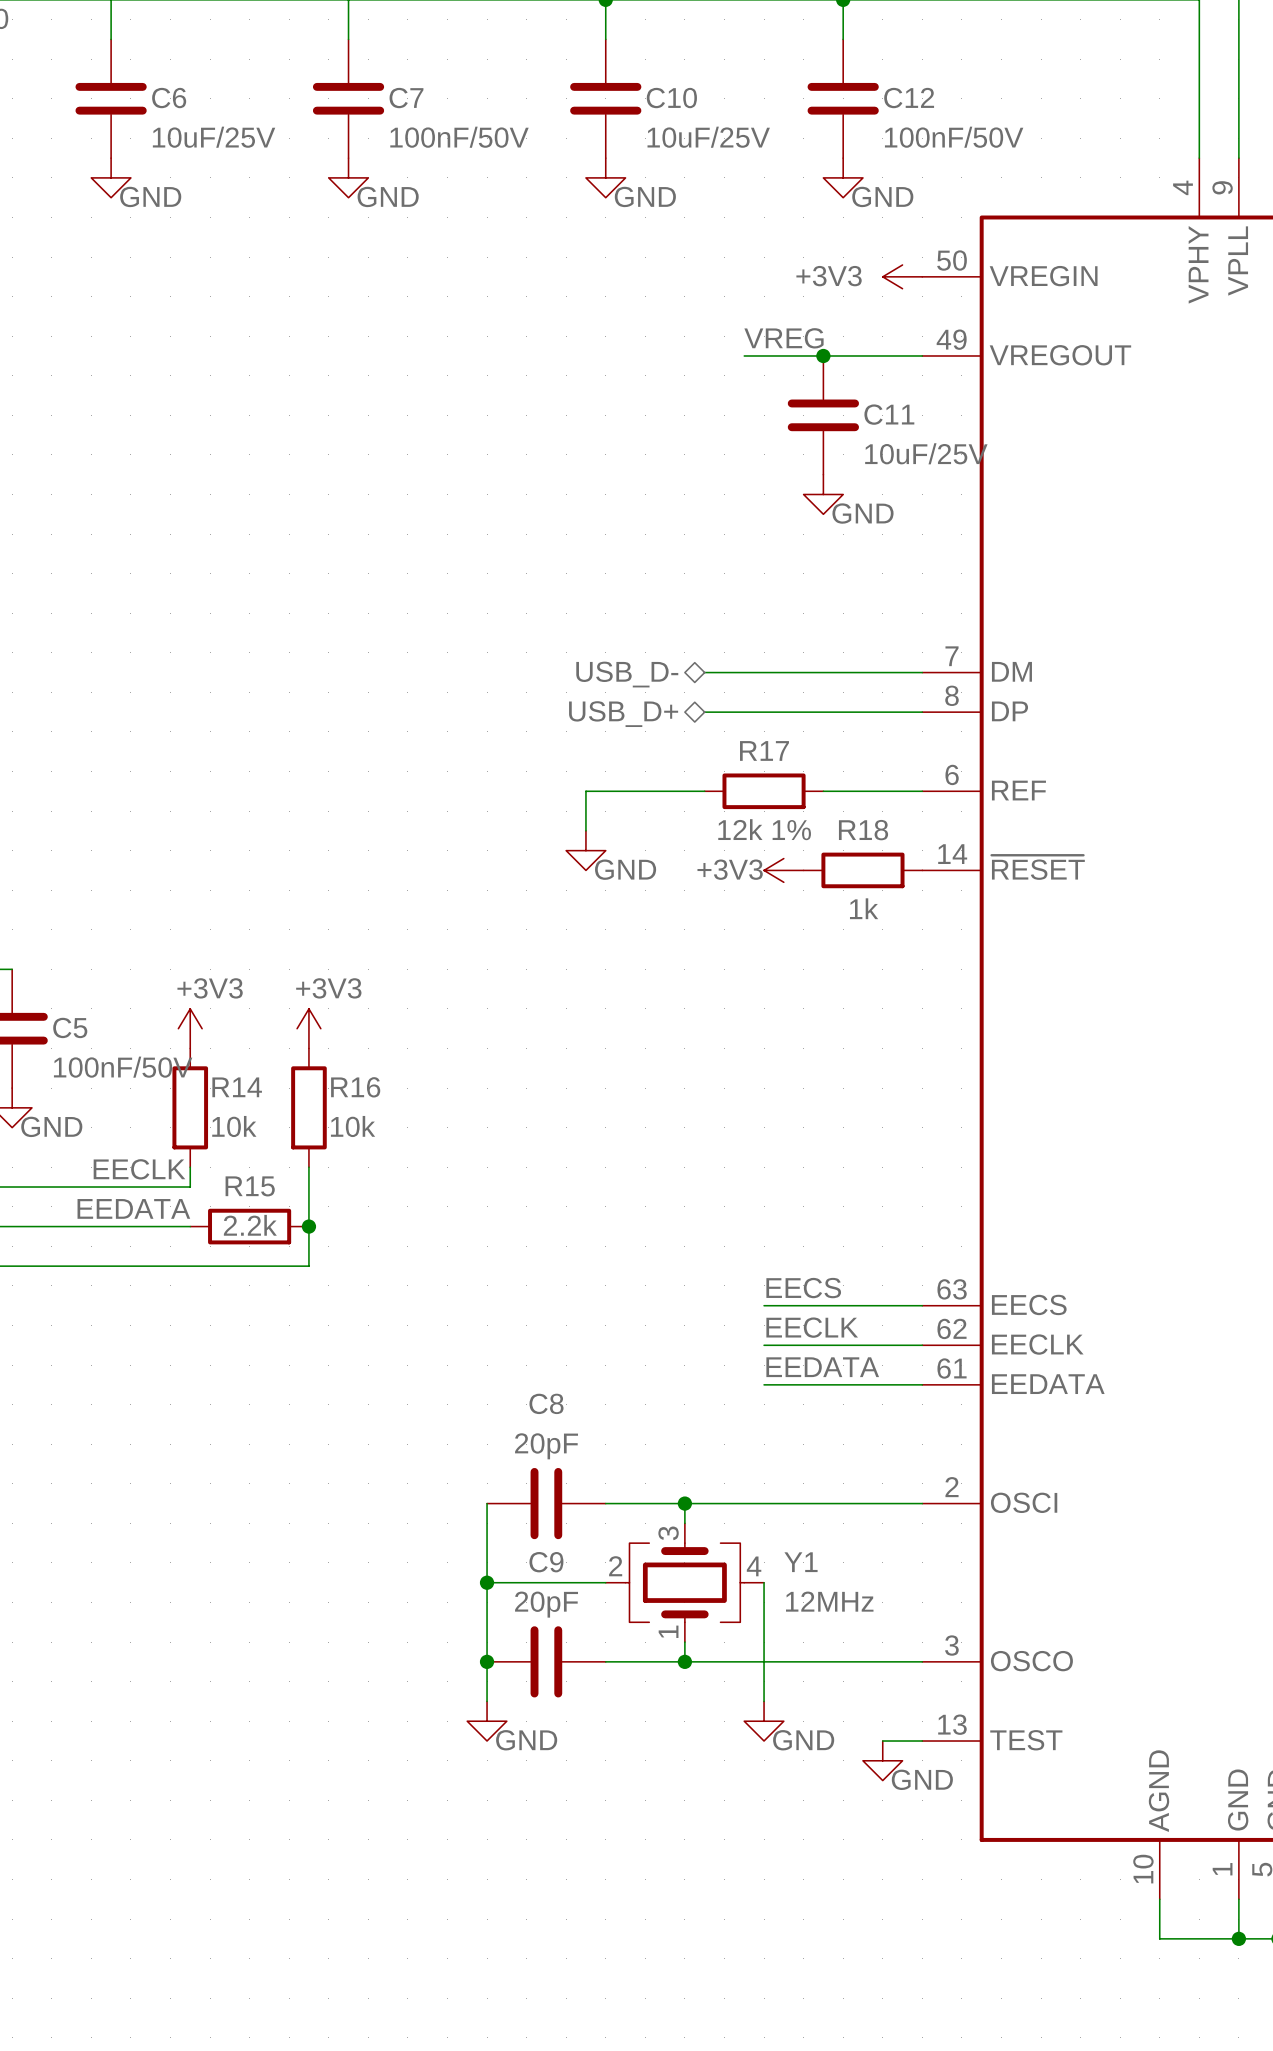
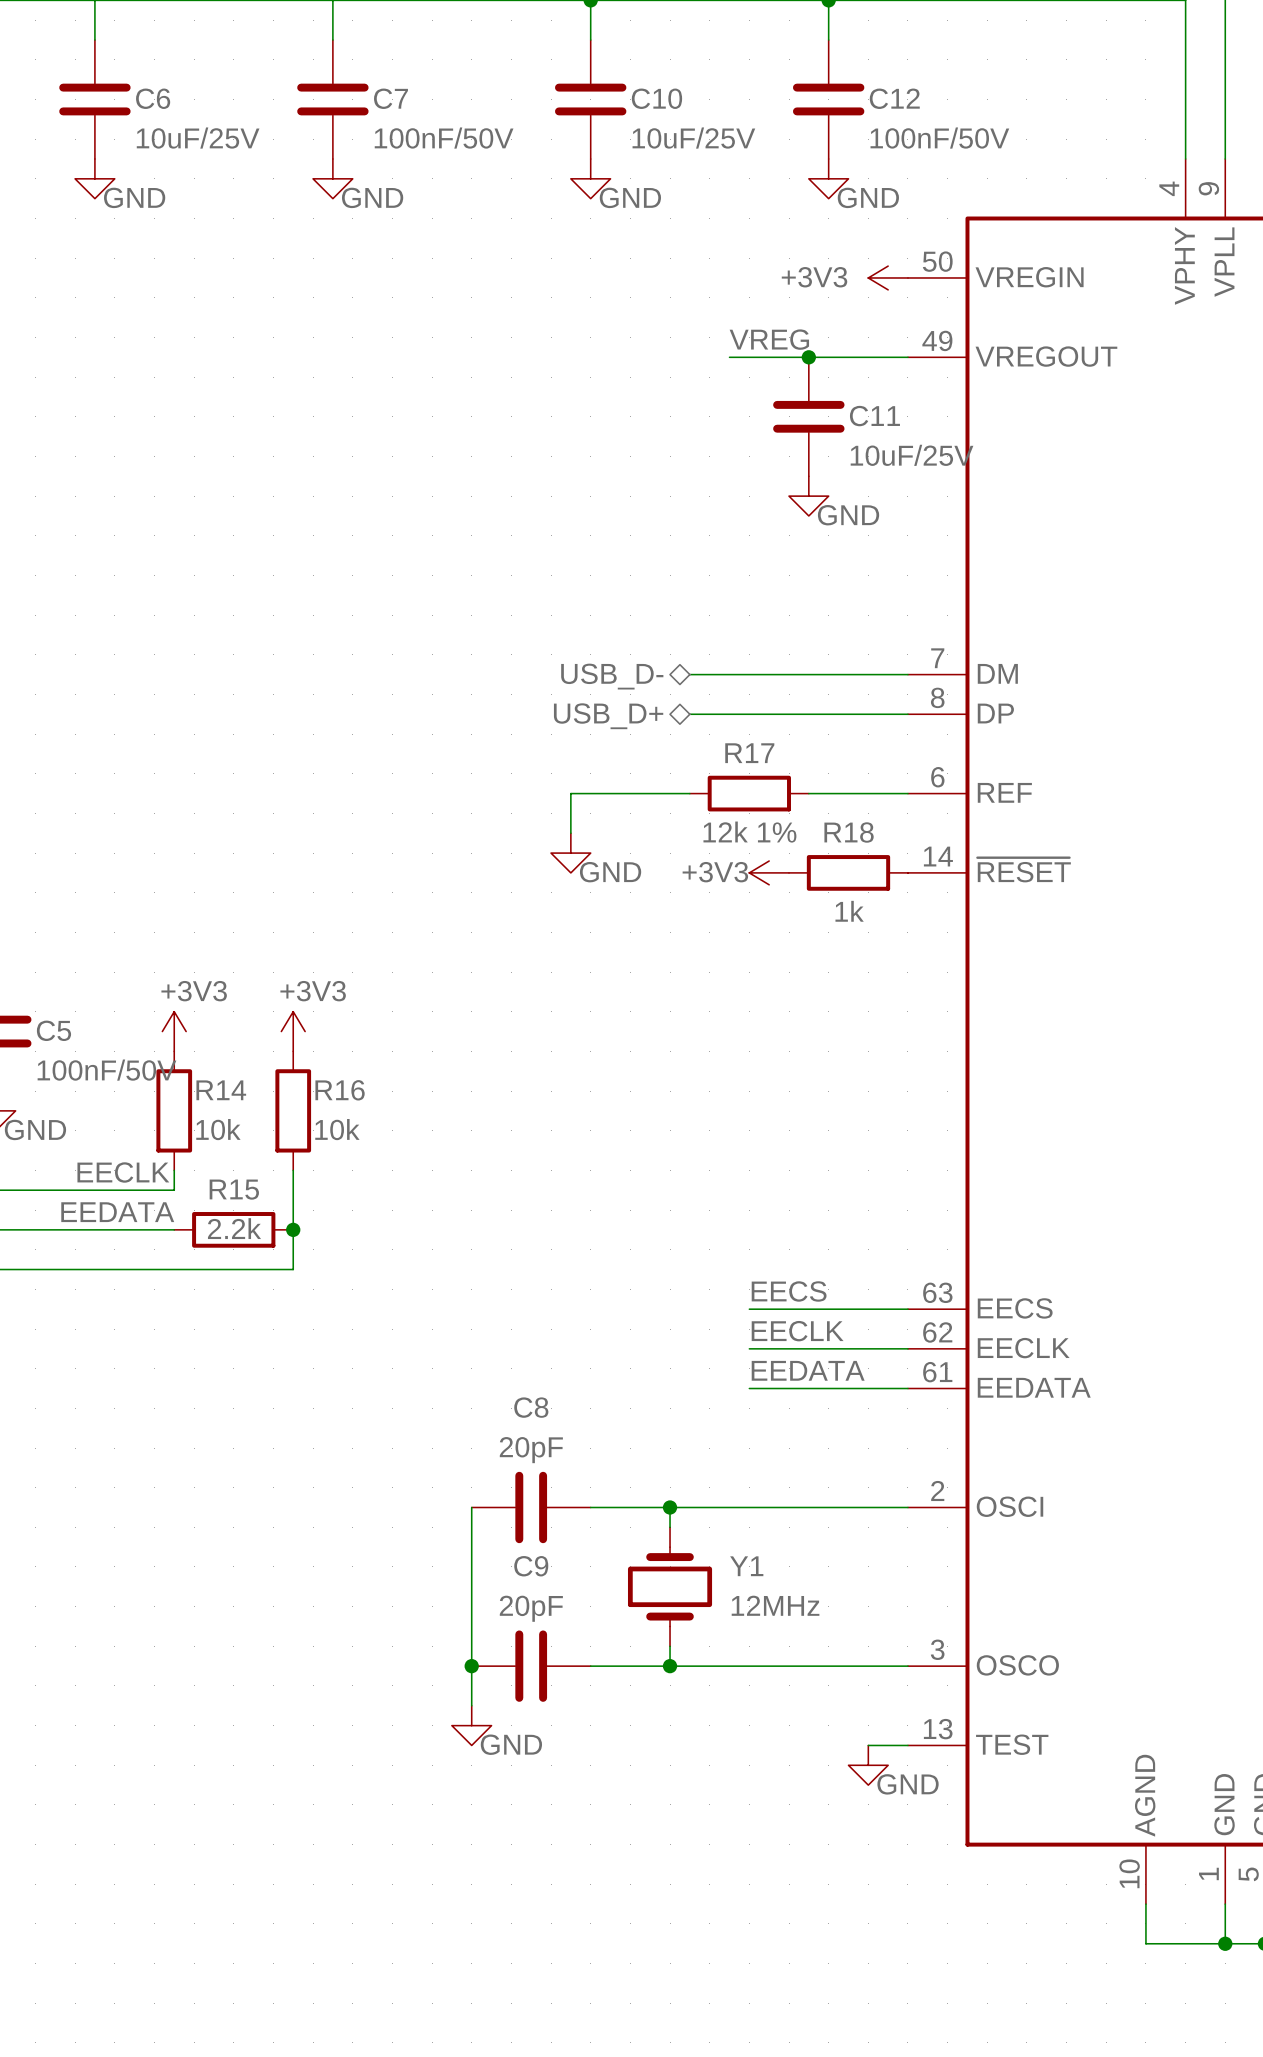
Y1 symbol: [605, 1523, 765, 1643] -> [627, 1527, 713, 1647]
Y1 name position: Y1 (801, 1562) -> Y1 (746, 1566)
wire: (487, 1582) (605, 1582) -> none
junction: (487, 1582) -> none
wire: (764, 1582) (764, 1701) -> none
Y1 value position: 12MHz (829, 1601) -> 12MHz (775, 1605)
power symbol: GND (764, 1721) -> none

